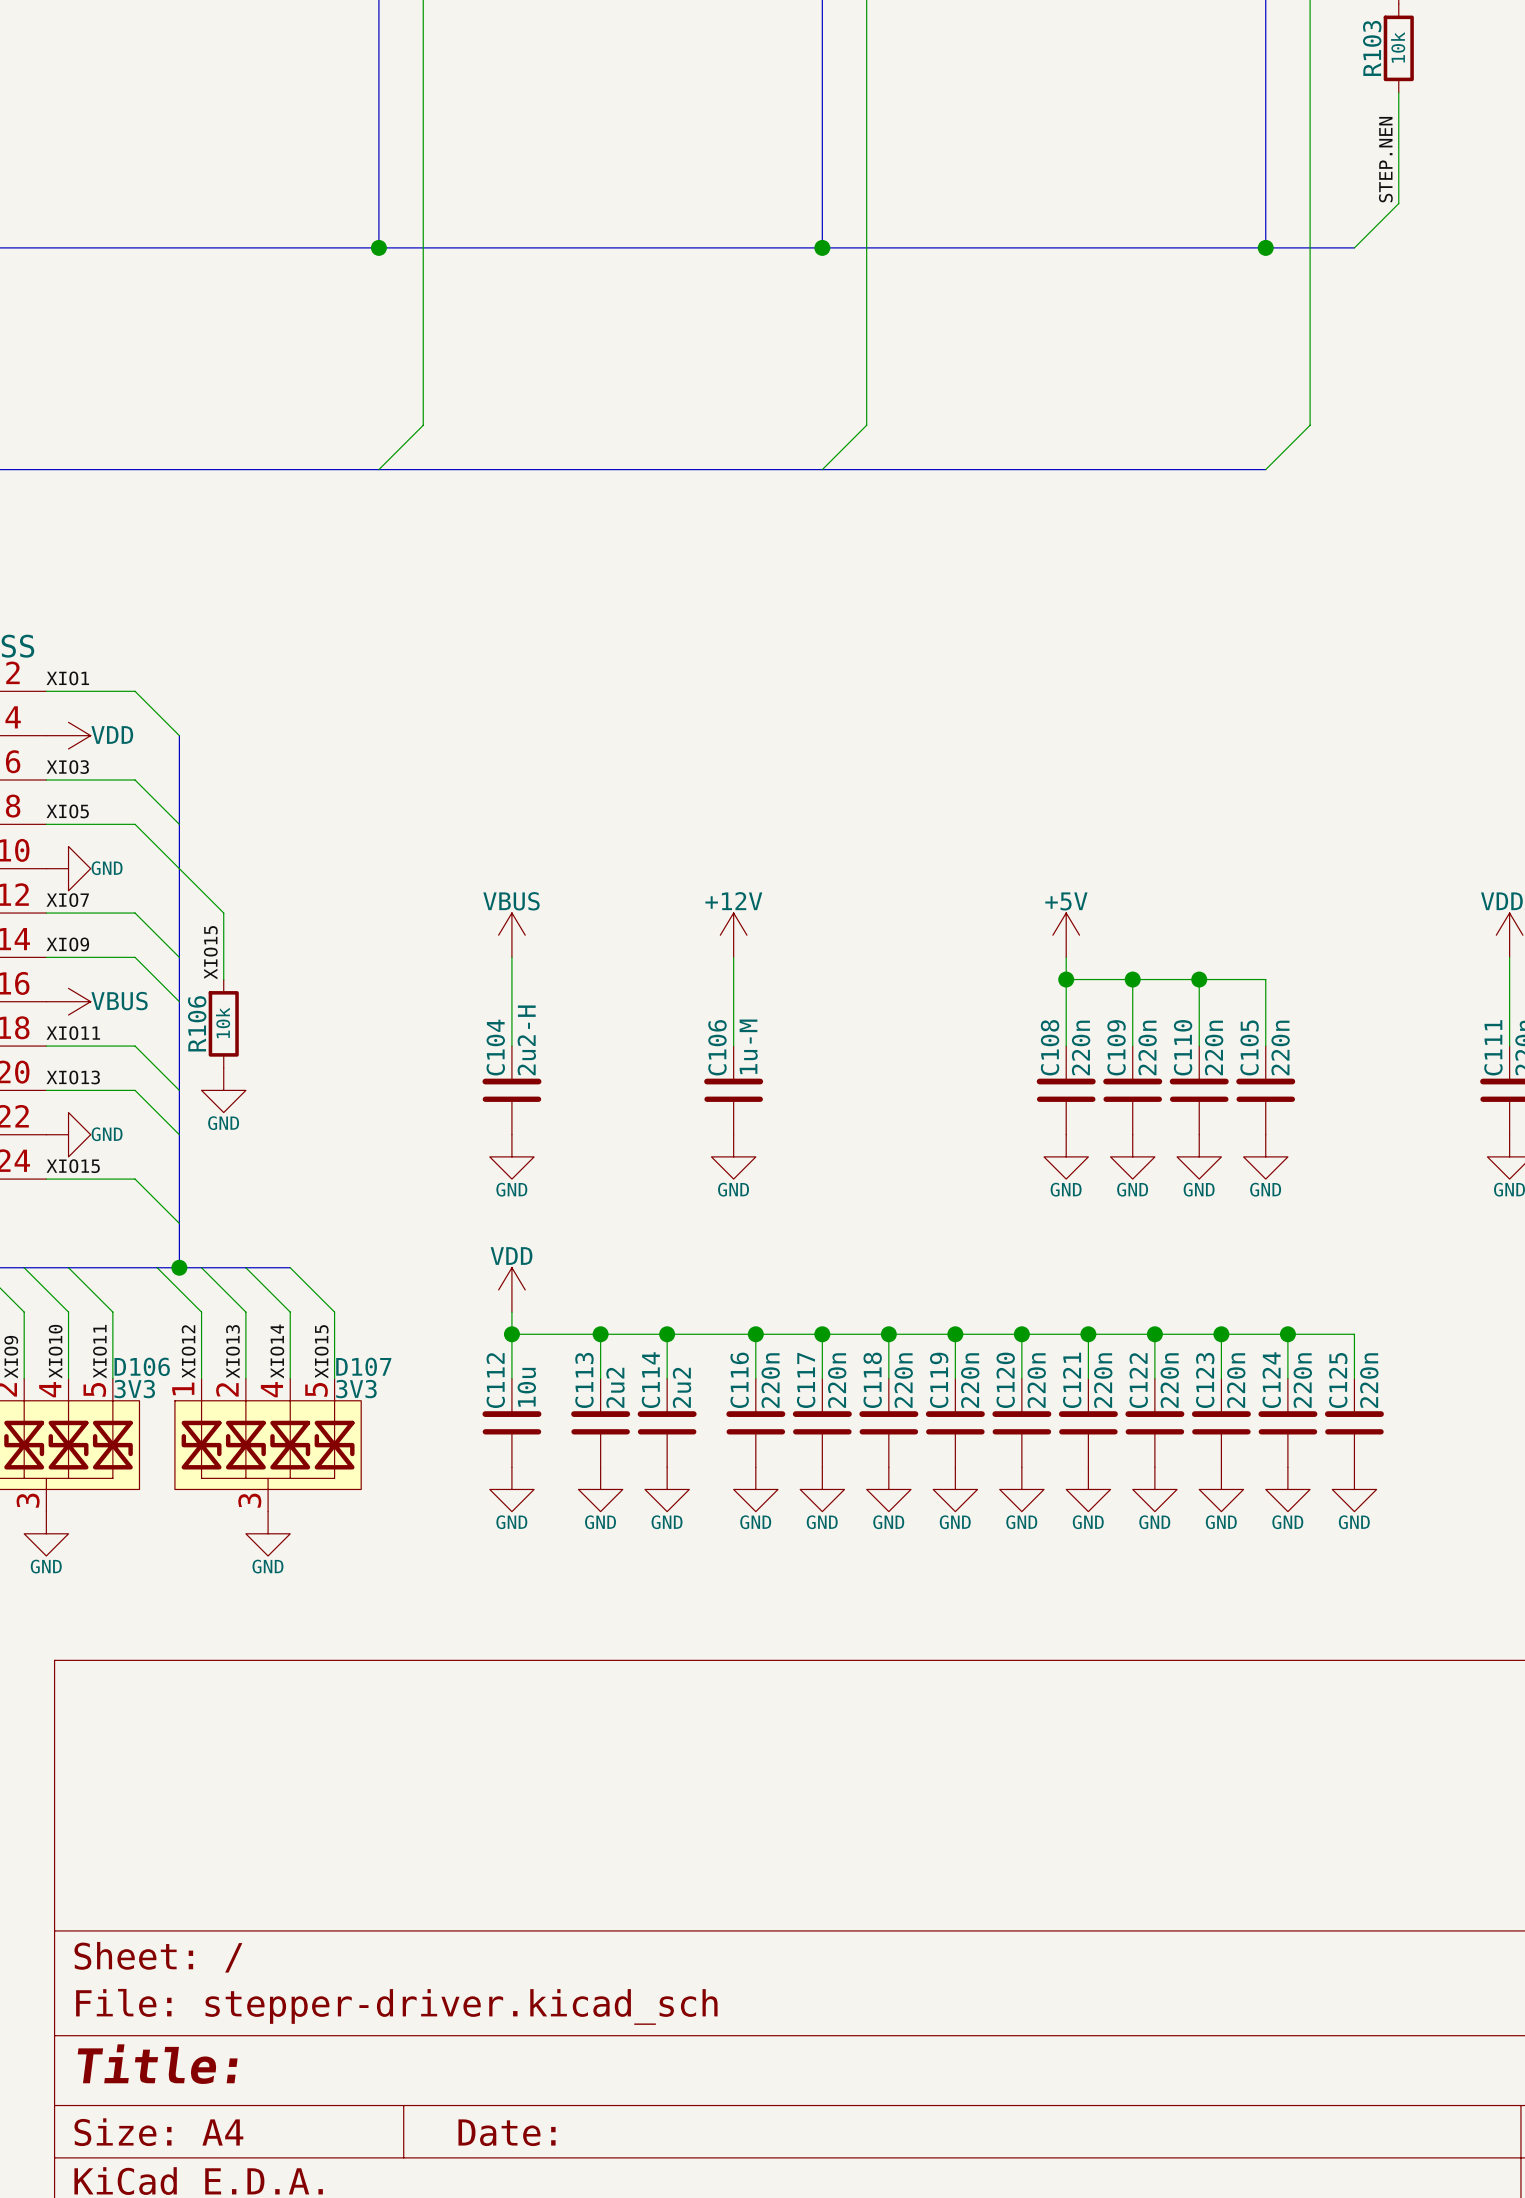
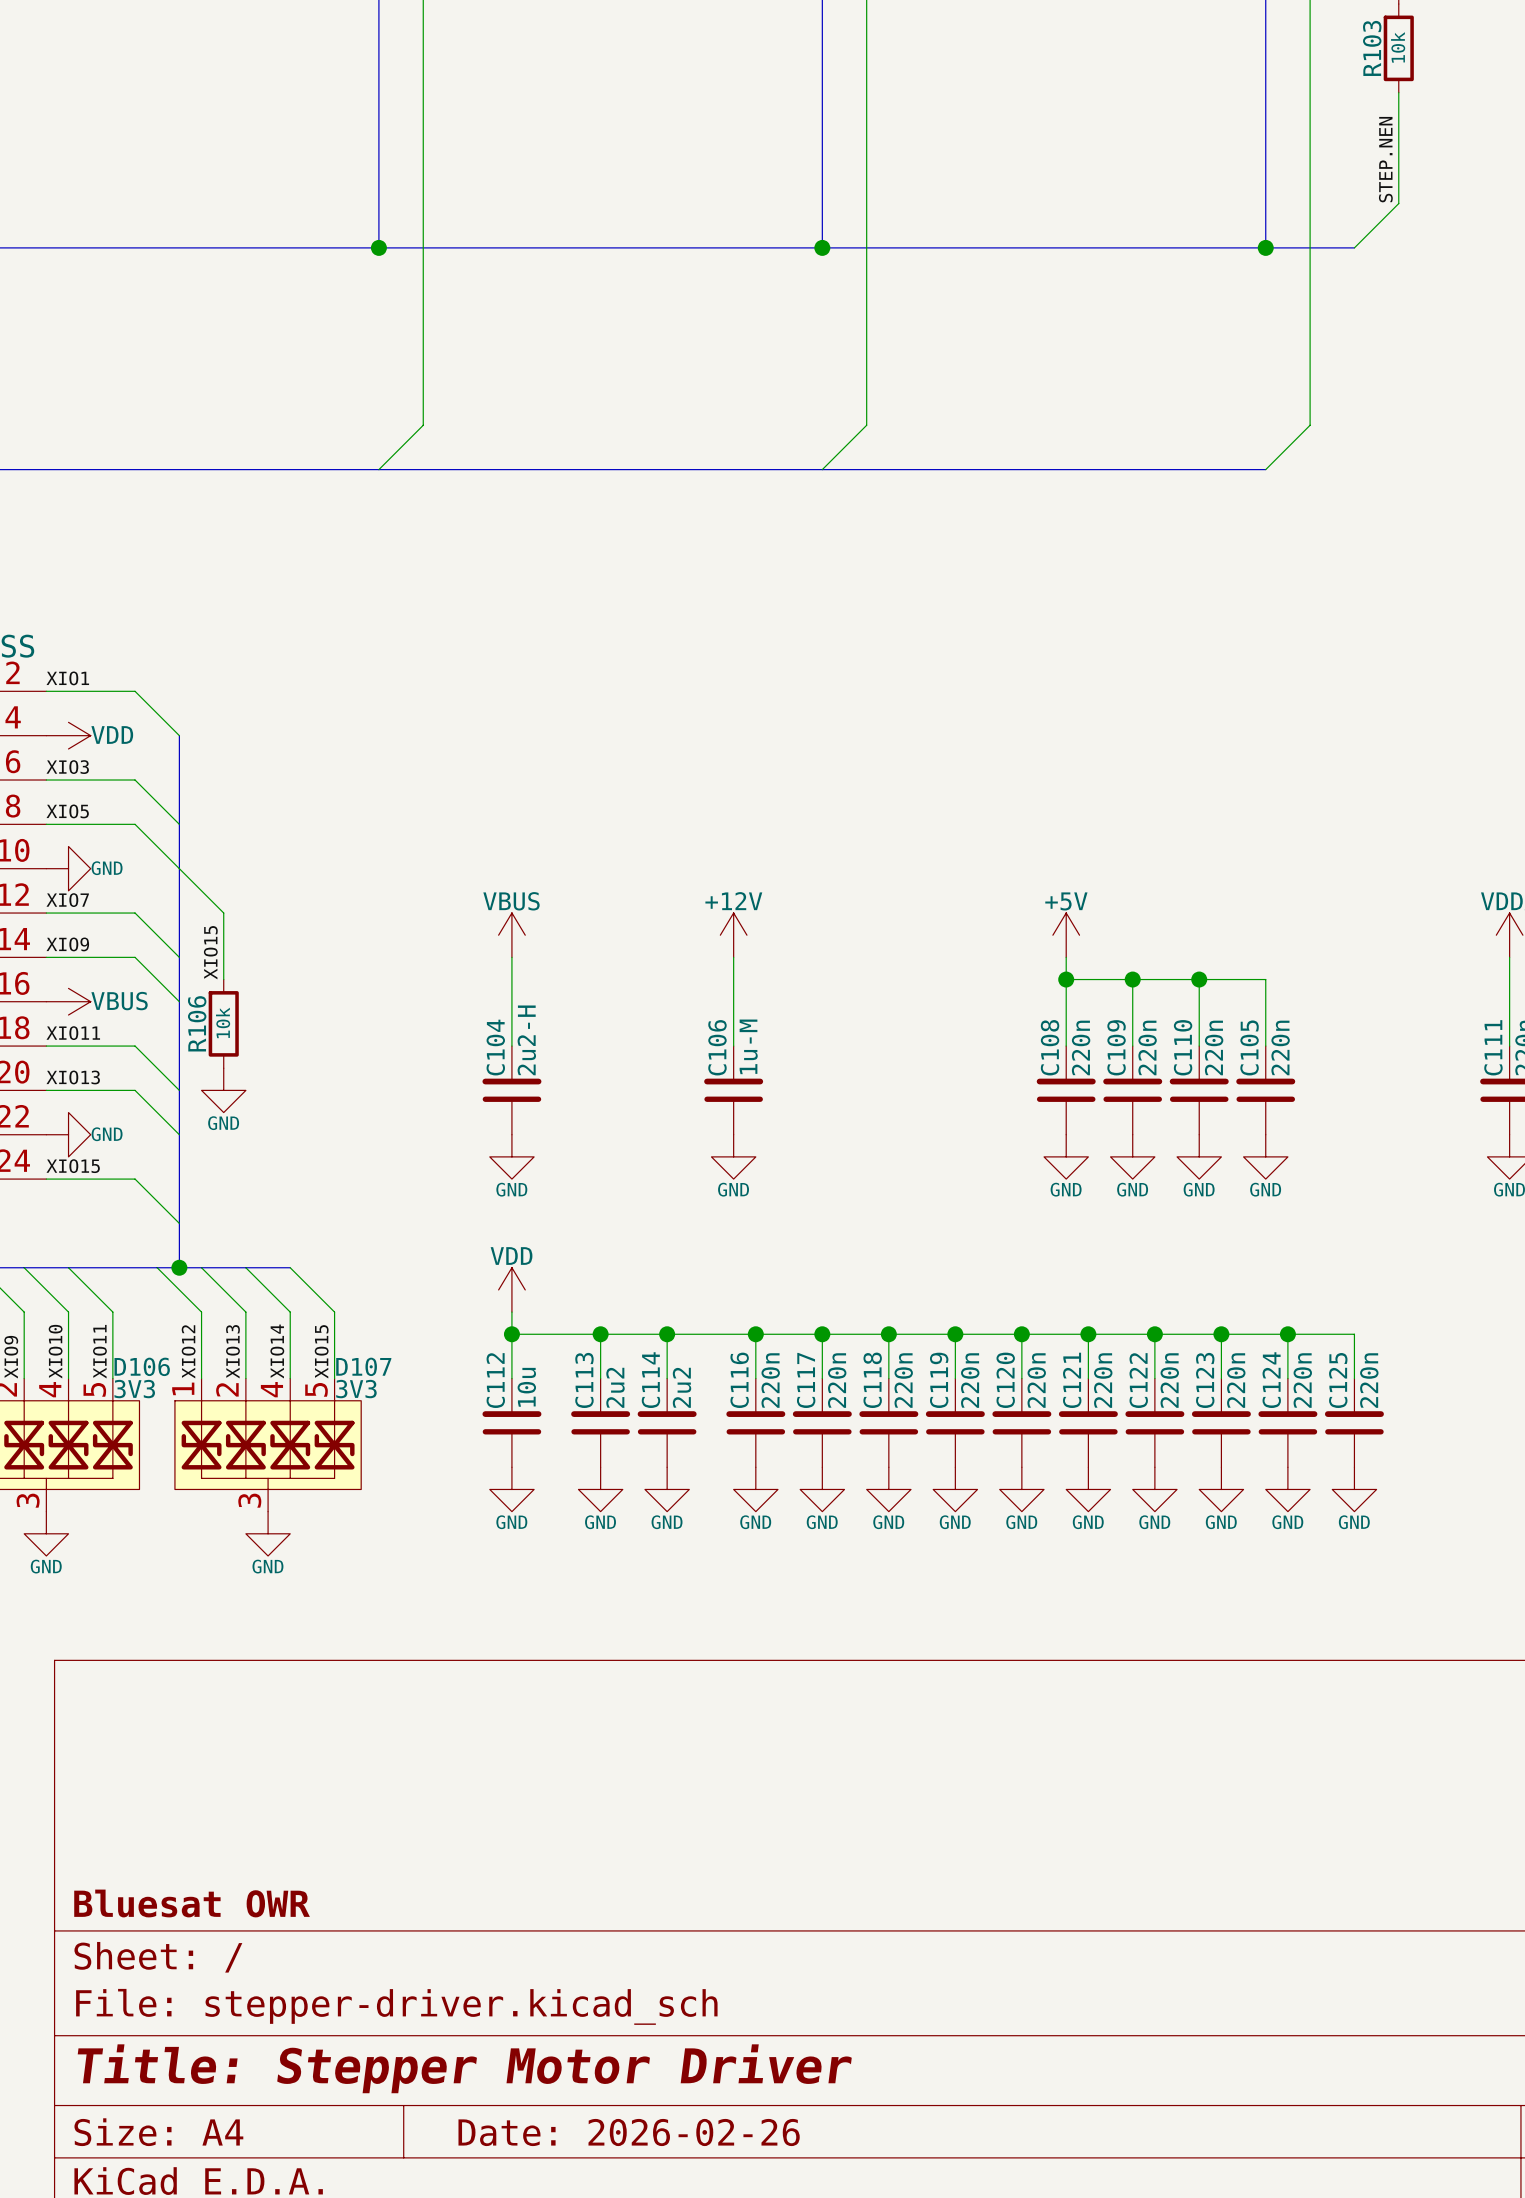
title block: none -> Bluesat OWR (192, 1903)
title block: Title: (157, 2064) -> Title: Stepper Motor Driver (464, 2068)
title block: Date: (507, 2132) -> Date: 2026-02-26 (629, 2132)

